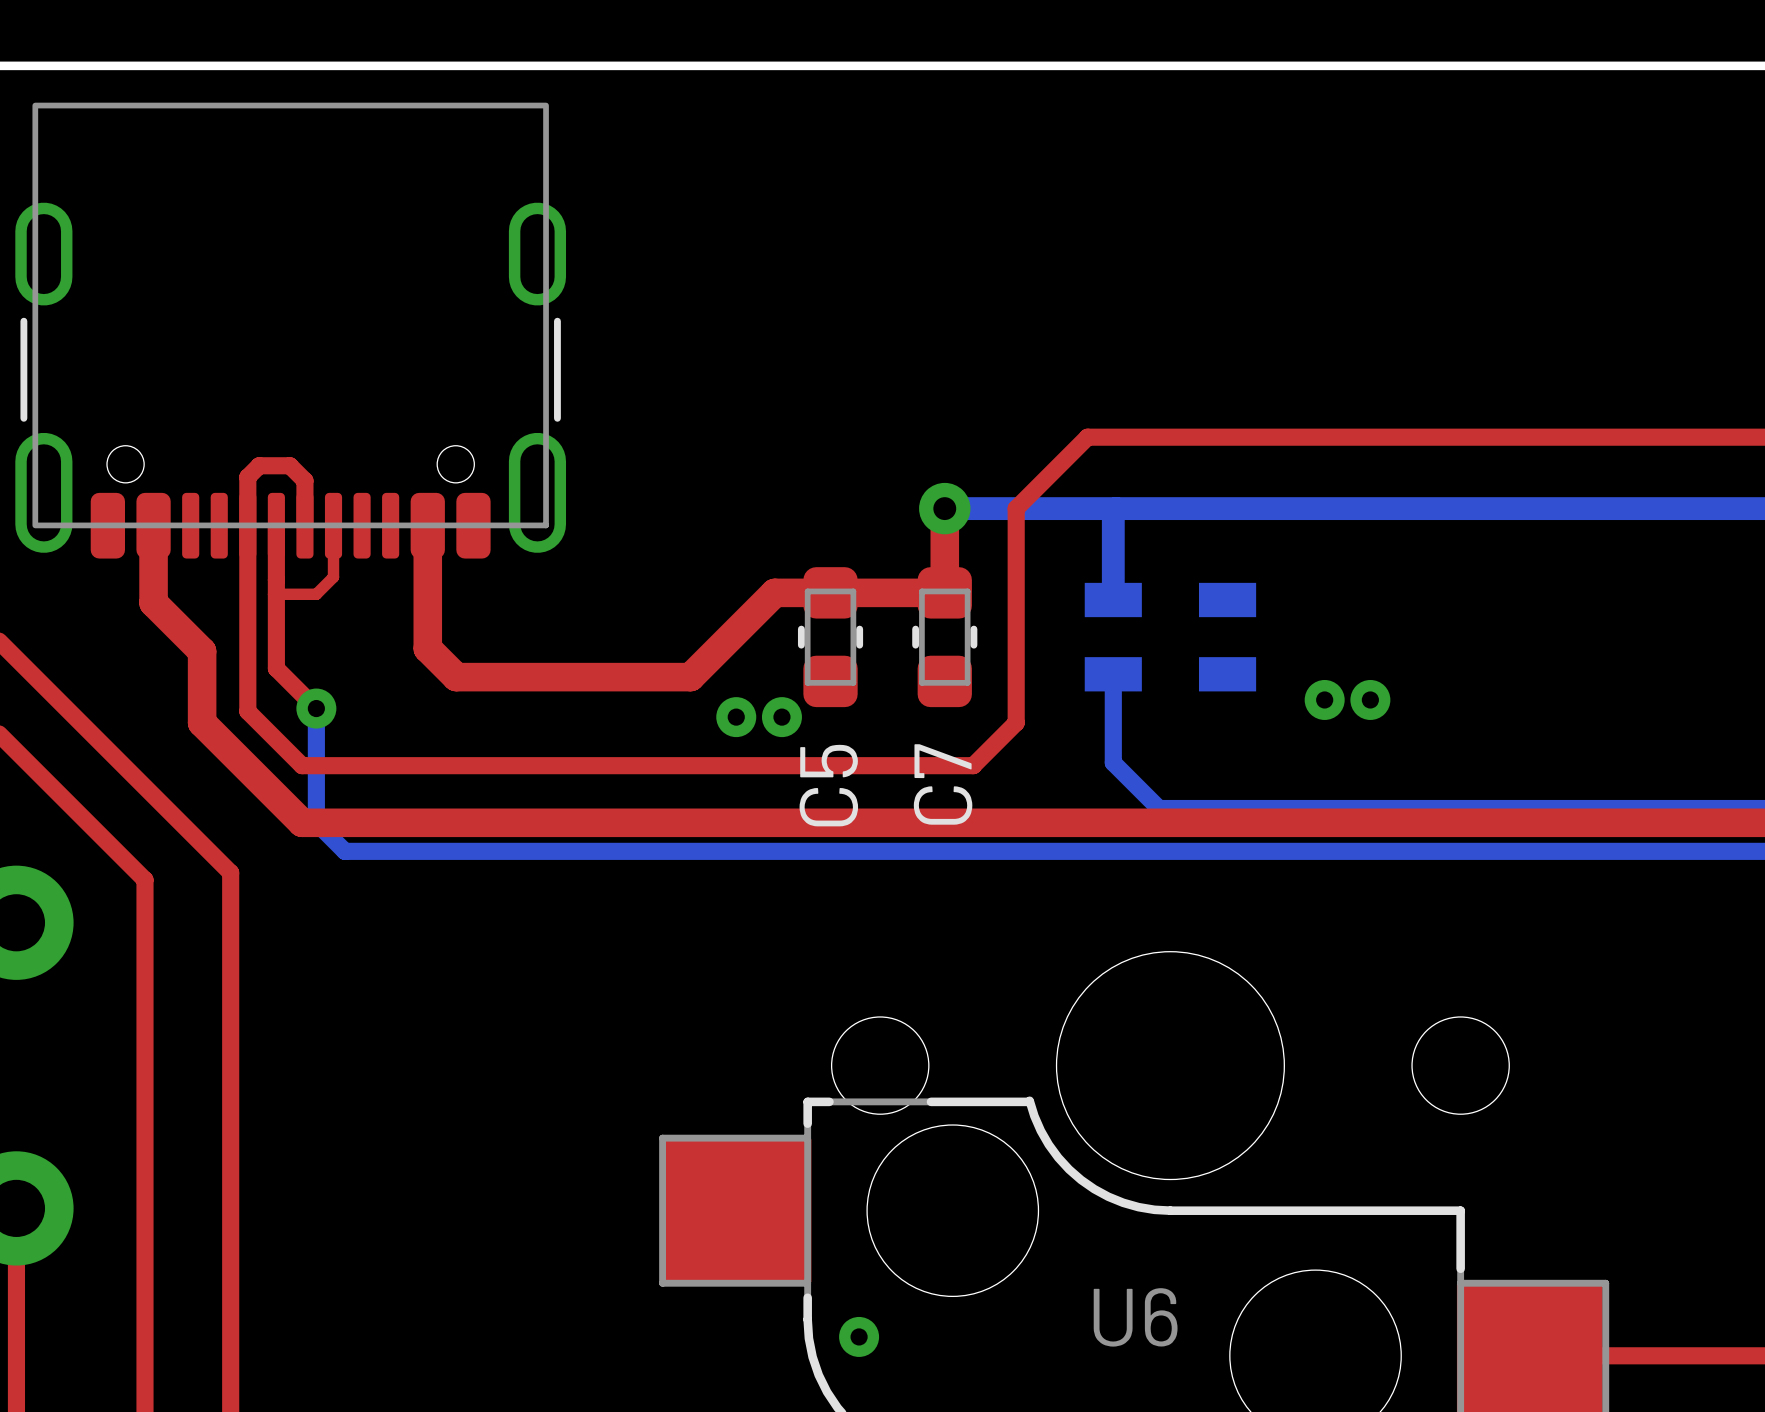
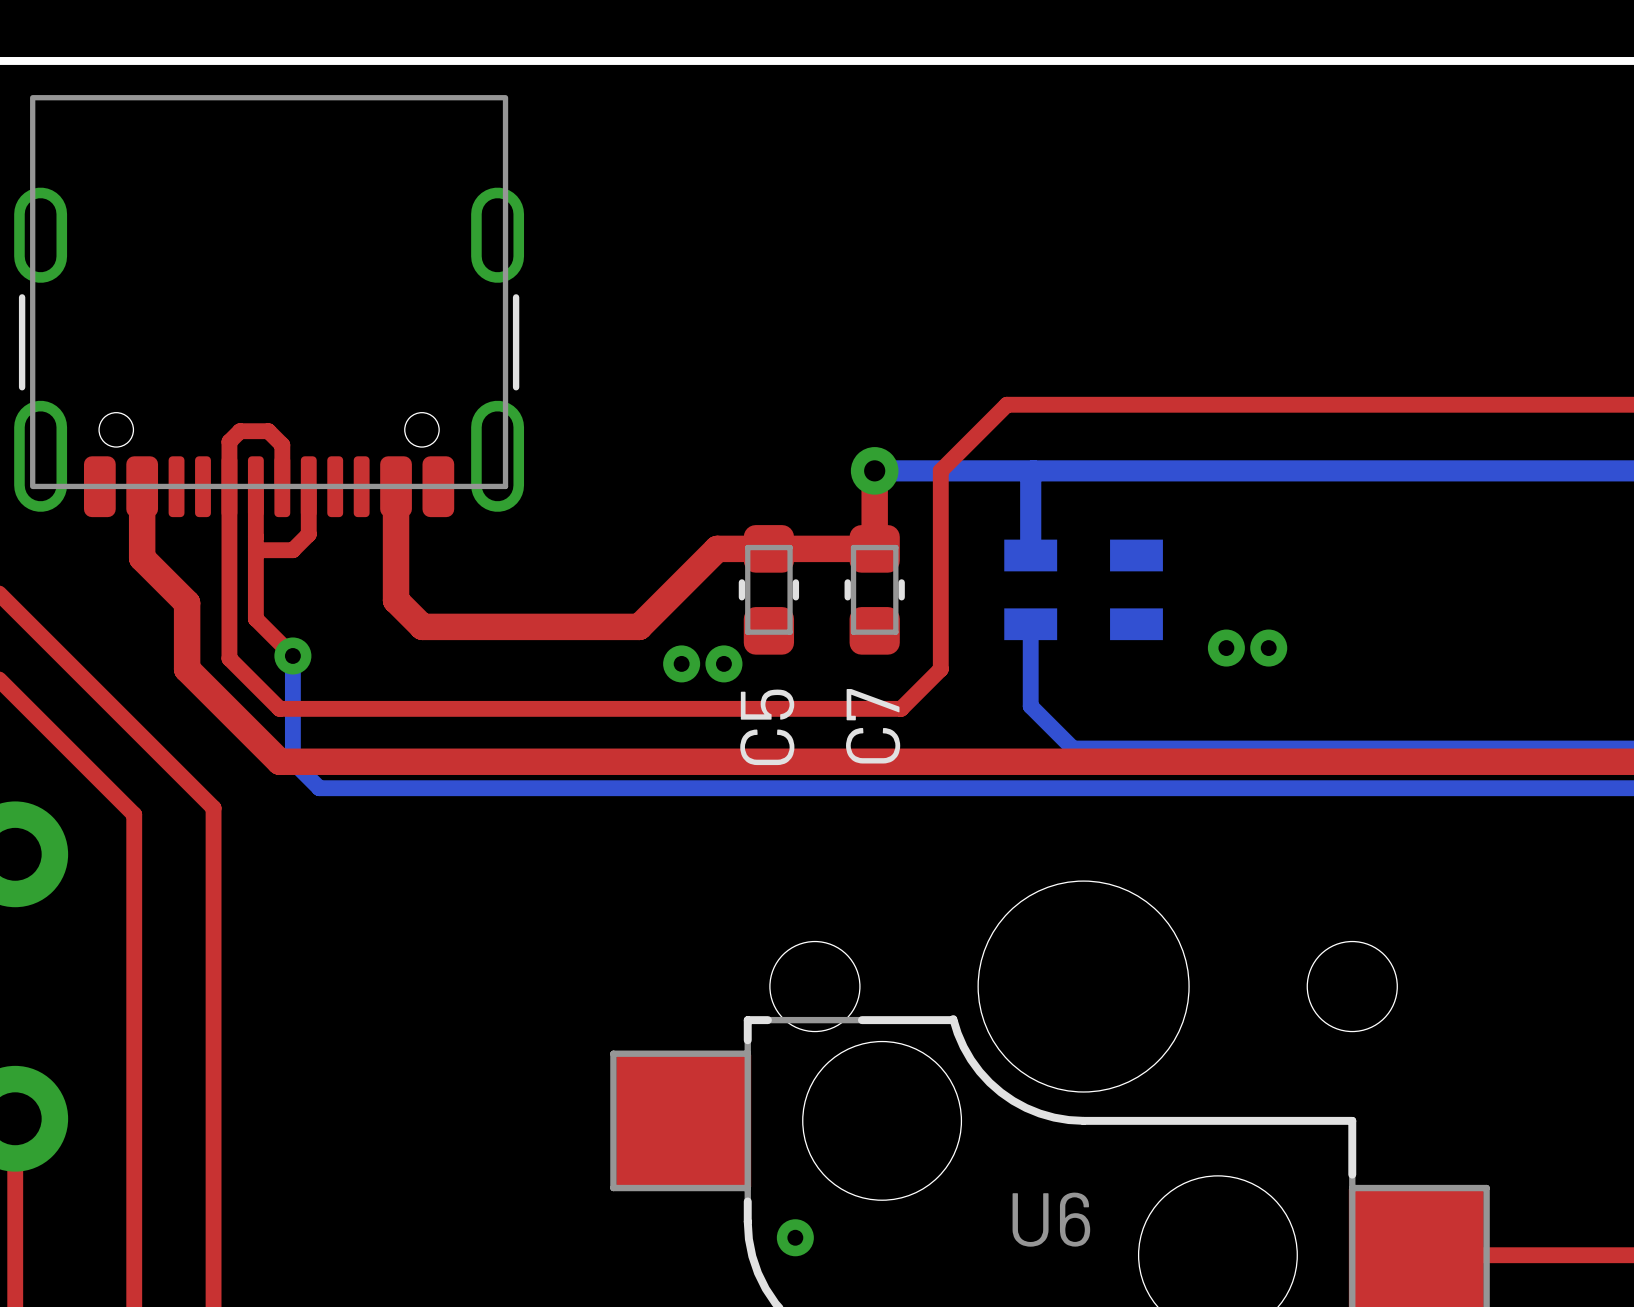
top track width: thin (333, 525) (333, 577) (316, 594) (276, 594) -> thick (308, 486) (308, 534) (292, 550) (255, 550)

